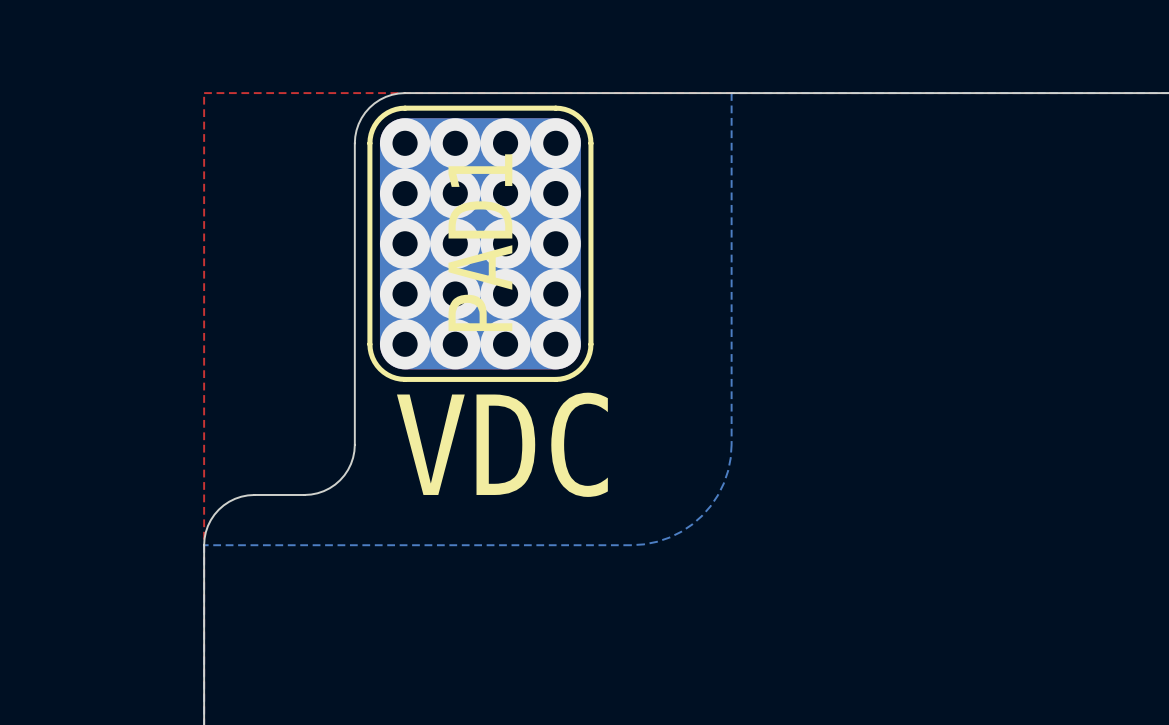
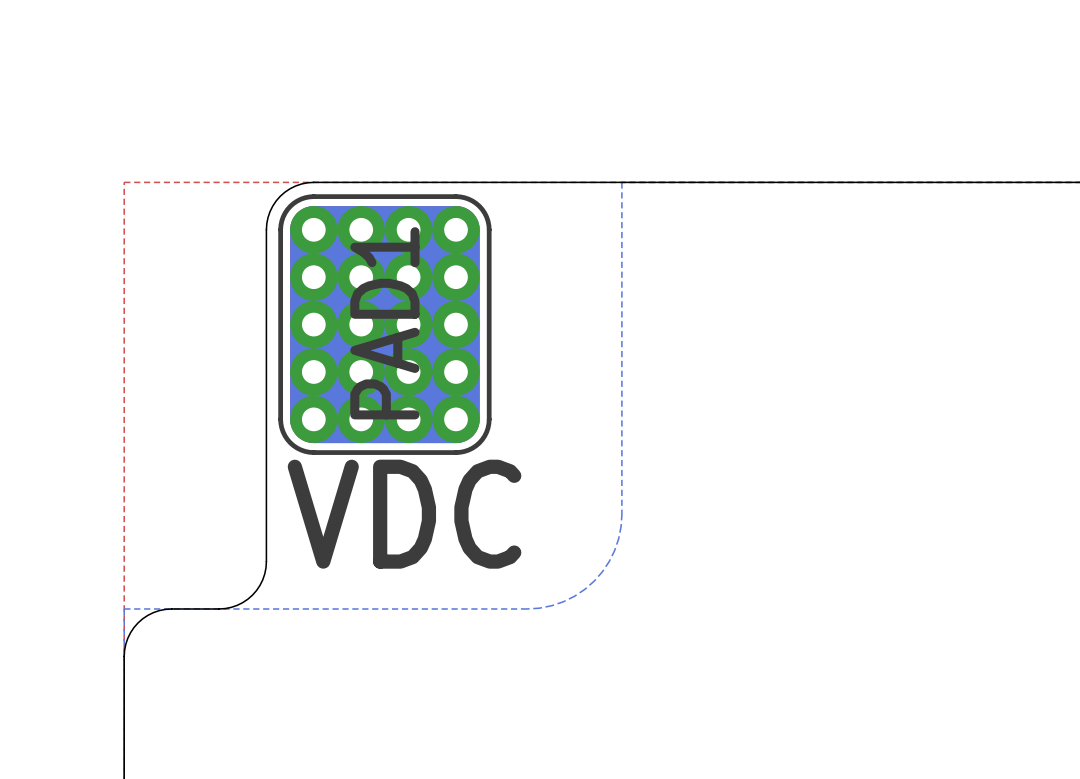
board edge: (354, 444) (351, 463) (344, 475) (335, 484) (323, 491) (304, 494) (247, 495) (235, 498) (218, 509) (207, 526) (204, 538) (204, 595) -> (266, 514) (266, 567) (262, 579) (252, 595) (237, 605) (225, 608) (171, 608) (153, 612) (142, 618) (134, 627) (127, 638) (124, 656)

